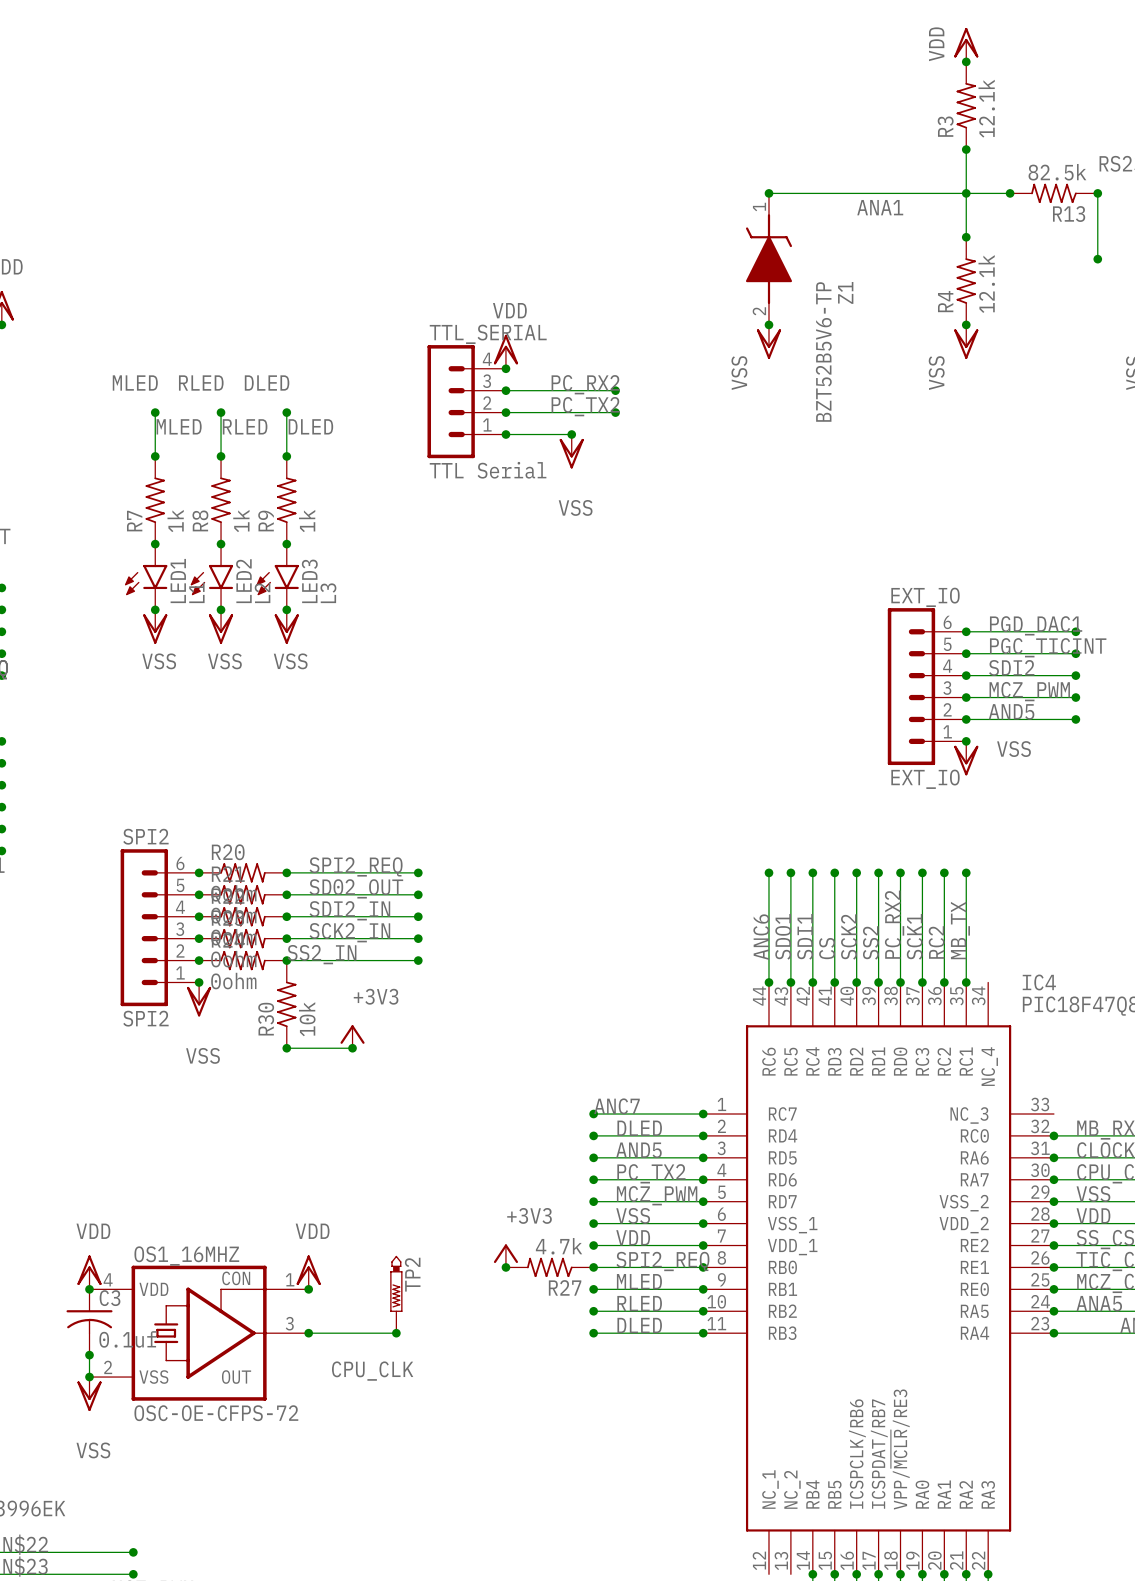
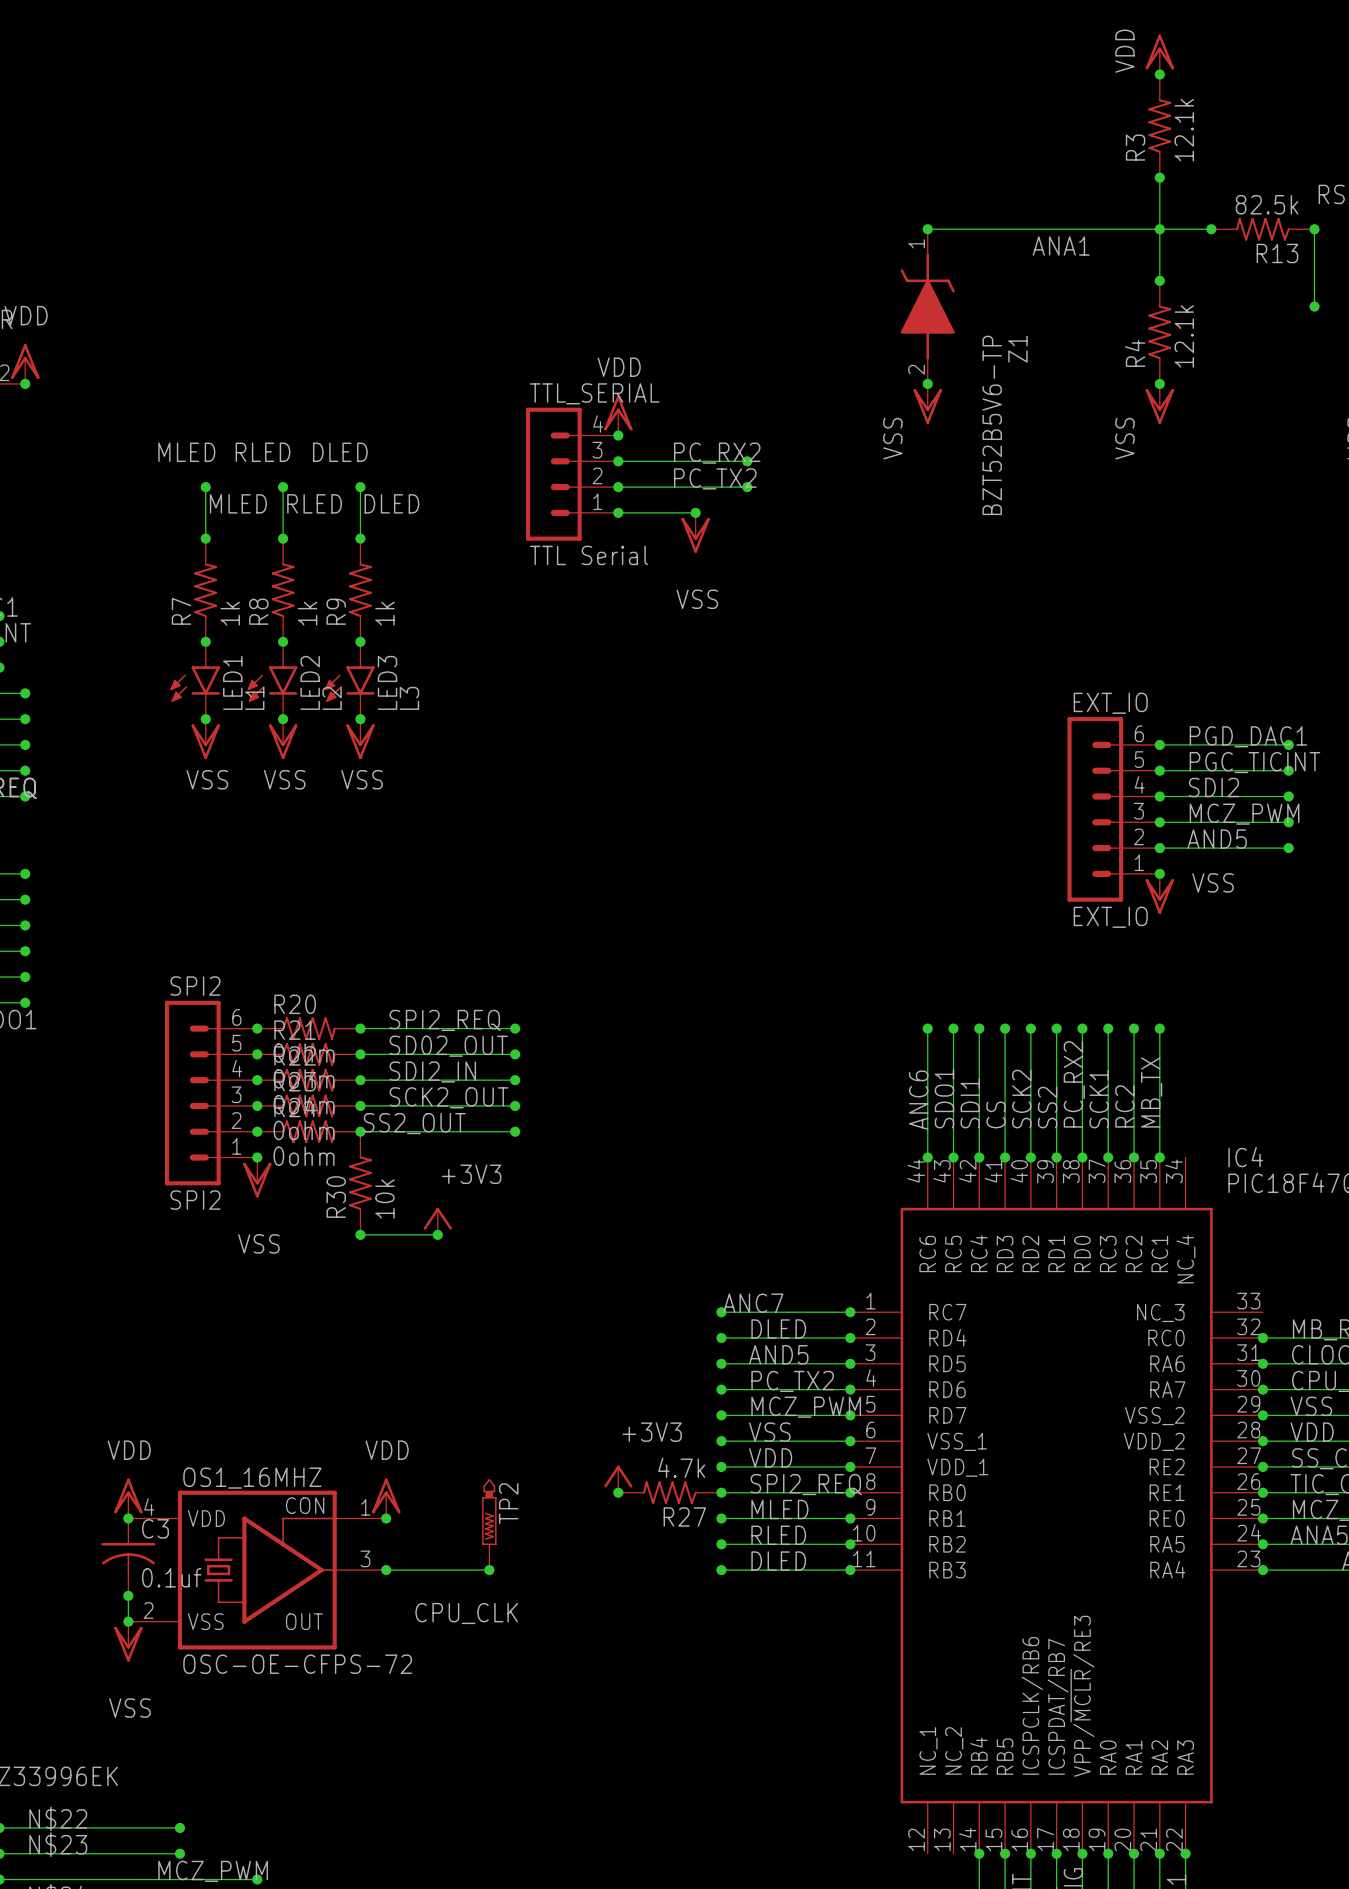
label: SCK2_IN (349, 932) -> SCK2_OUT (449, 1097)
label: SS2_IN (322, 954) -> SS2_OUT (414, 1123)

